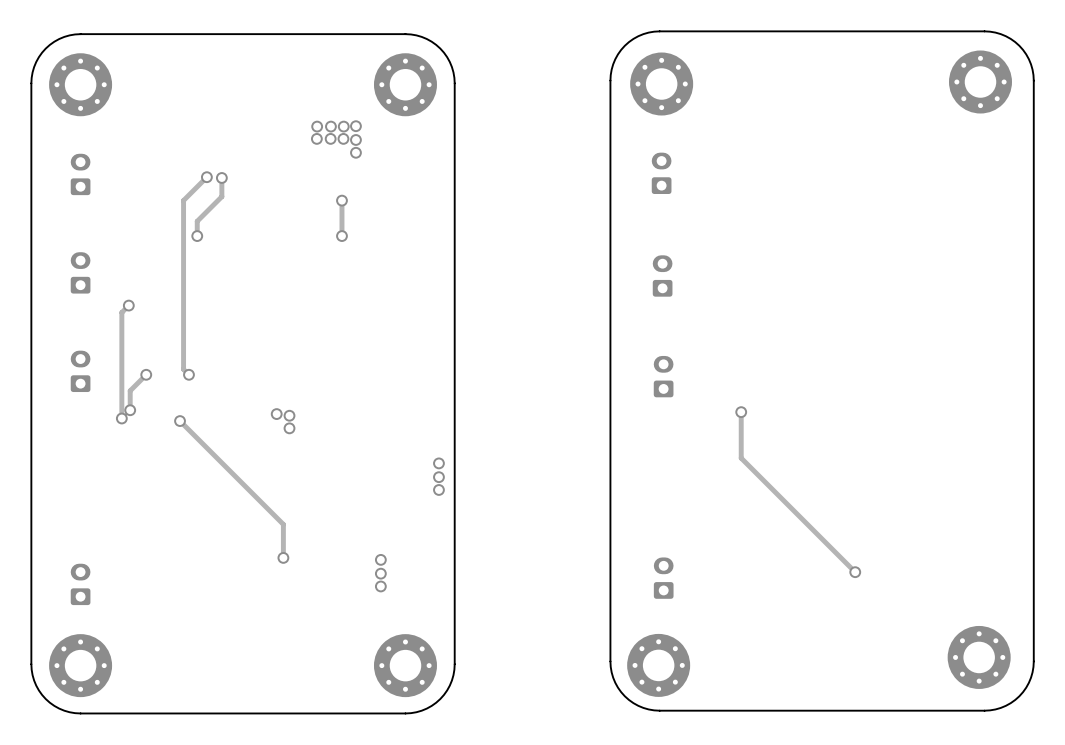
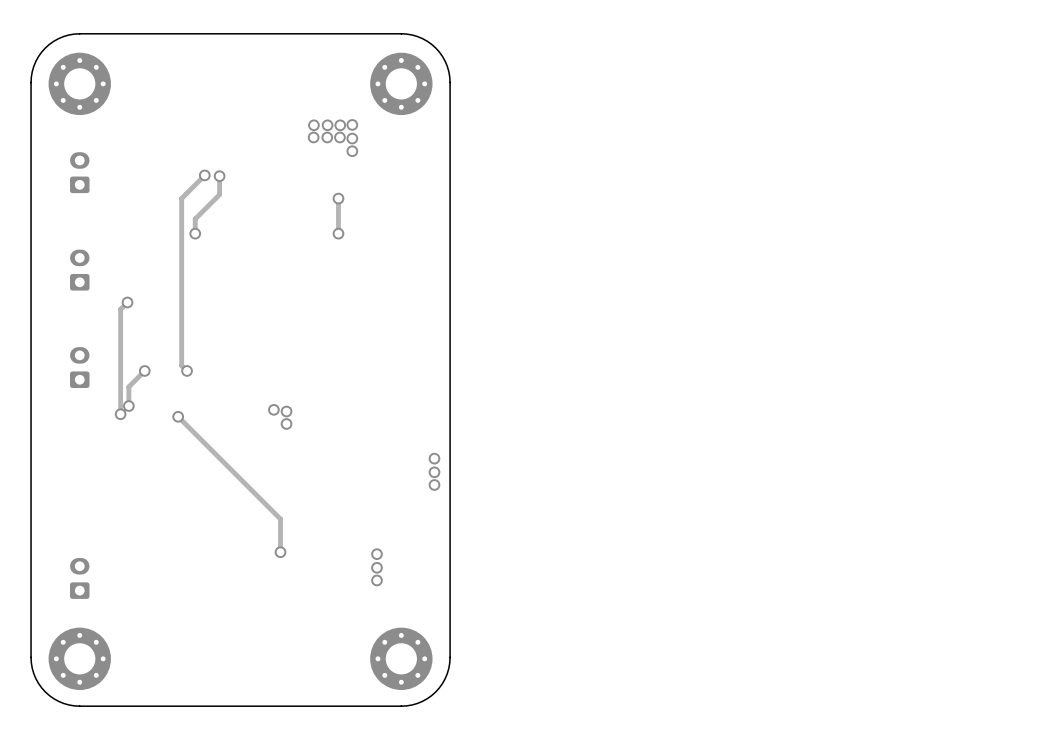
board edge: (984, 31) (654, 31) (638, 36) (628, 42) (615, 59) (610, 80) (610, 661) (611, 672) (617, 687) (628, 699) (638, 705) (659, 710) (990, 710) (1010, 703) (1019, 696) (1028, 682) (1033, 661) (1033, 75) (1028, 59) (1019, 45) (1005, 36) (984, 31) -> none
part: (980, 82) -> none
part: (661, 84) -> none
part: (661, 173) -> none
part: (662, 275) -> none
part: (663, 376) -> none
track: (741, 412) (741, 458) (855, 572) -> none
via: (741, 412) -> none
via: (855, 572) -> none
part: (663, 578) -> none
part: (979, 657) -> none
part: (658, 665) -> none

